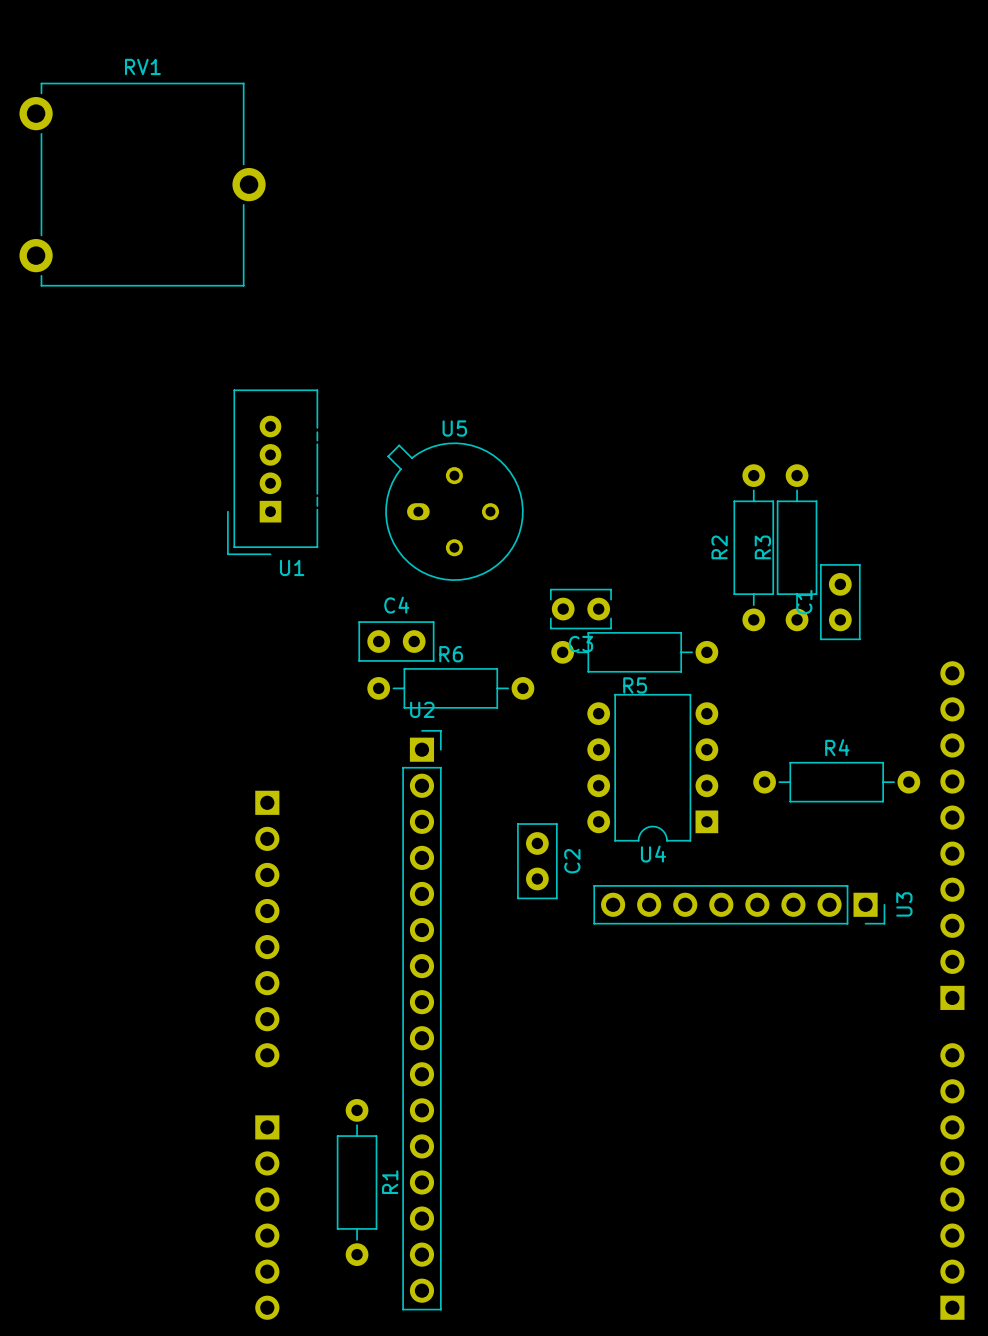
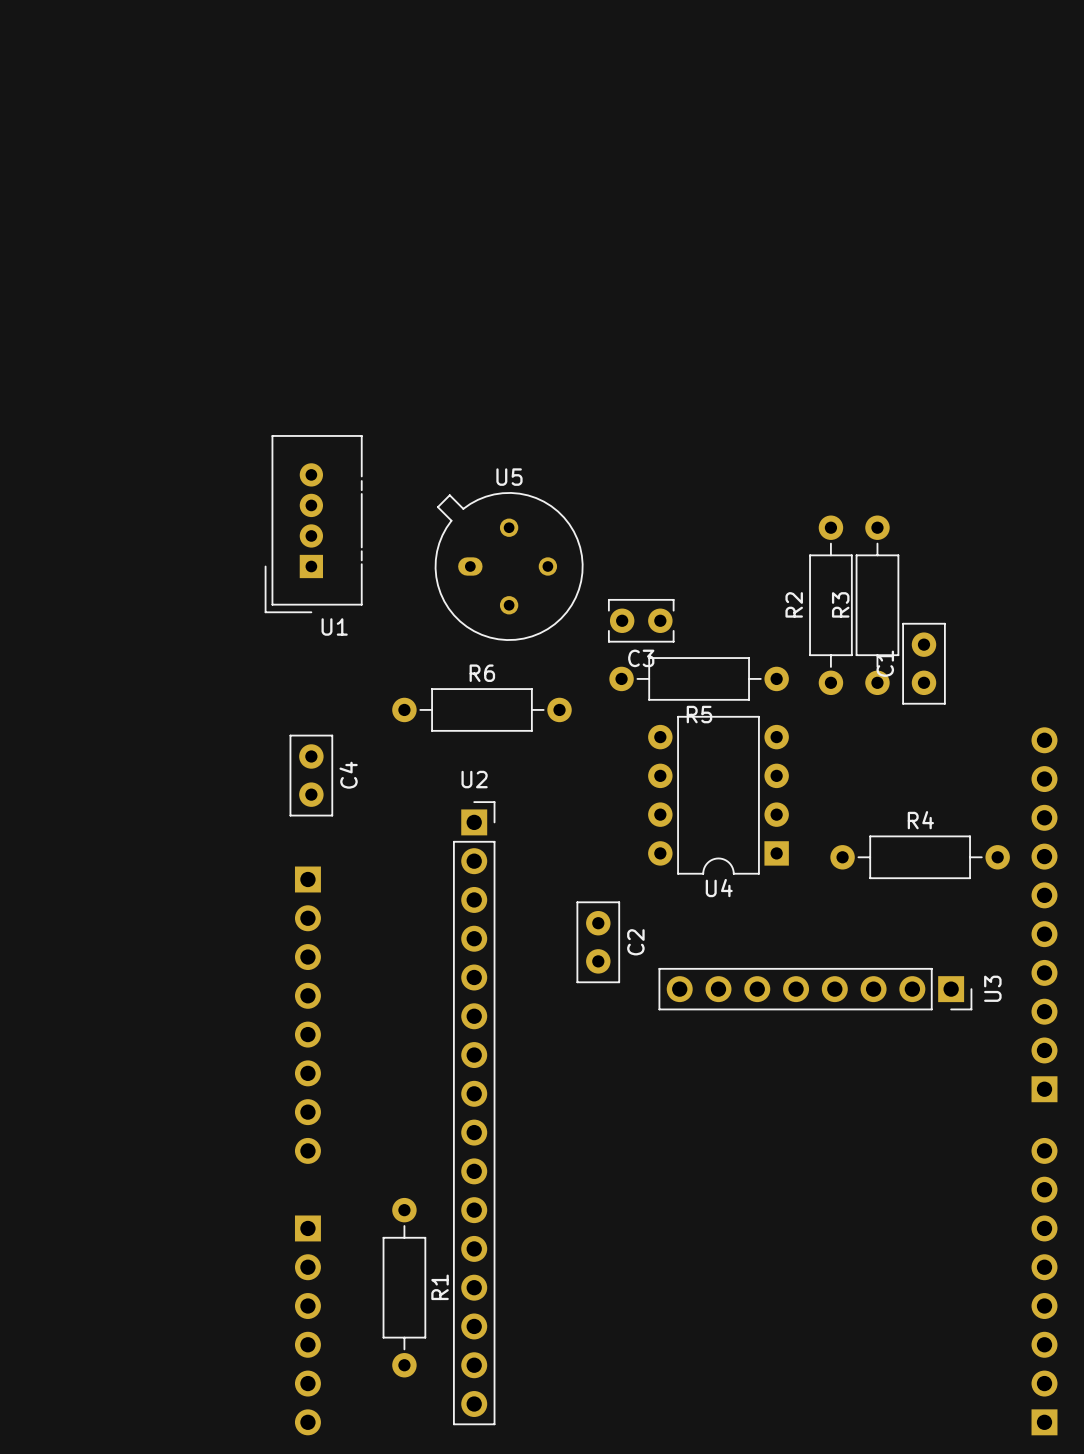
RV1: (142, 184) -> none
C3 position: (580, 609) -> (641, 620)
C4 rotation: 0° (396, 641) -> 90° clockwise (311, 775)
C4 position: (396, 641) -> (311, 775)
R5 position: (634, 652) -> (699, 678)
R6 position: (450, 688) -> (481, 709)
U4 position: (652, 767) -> (718, 795)

